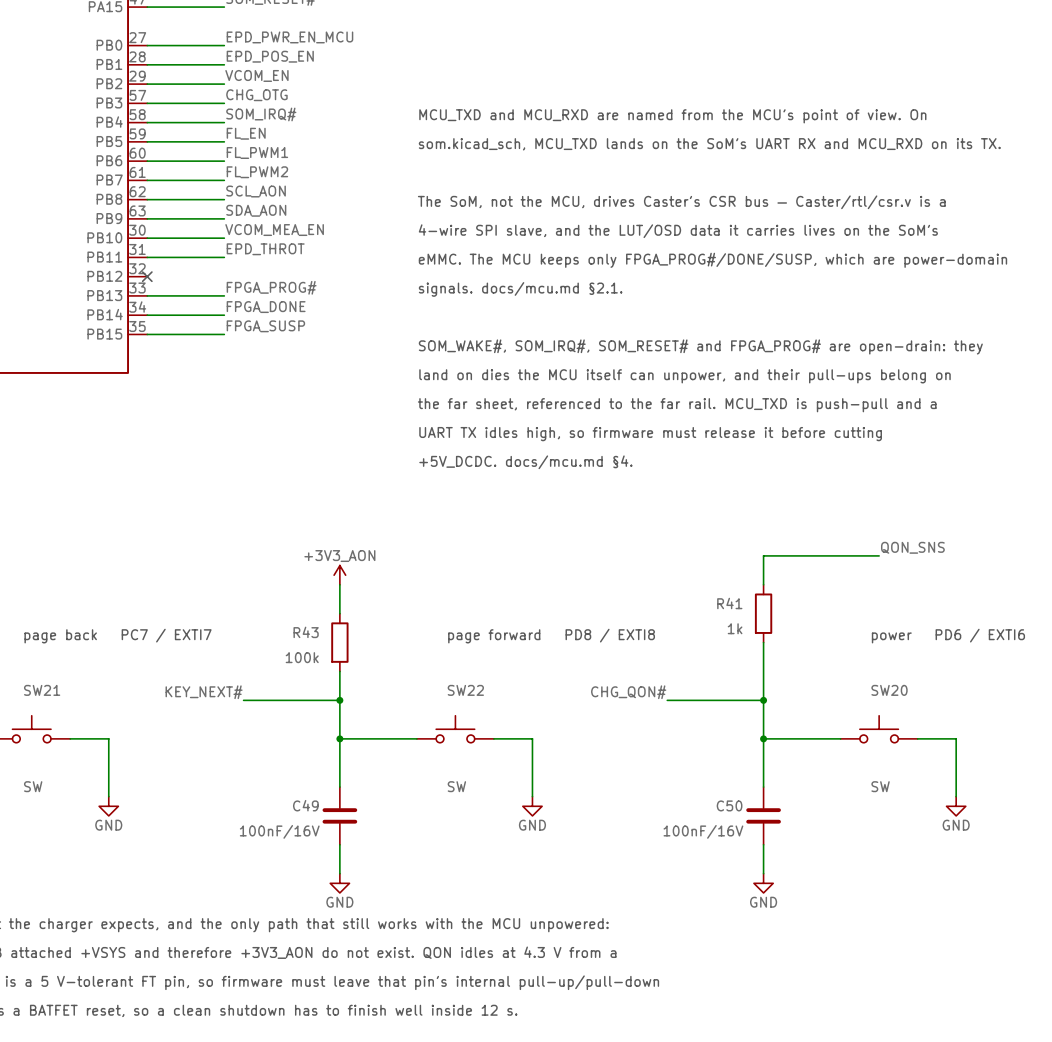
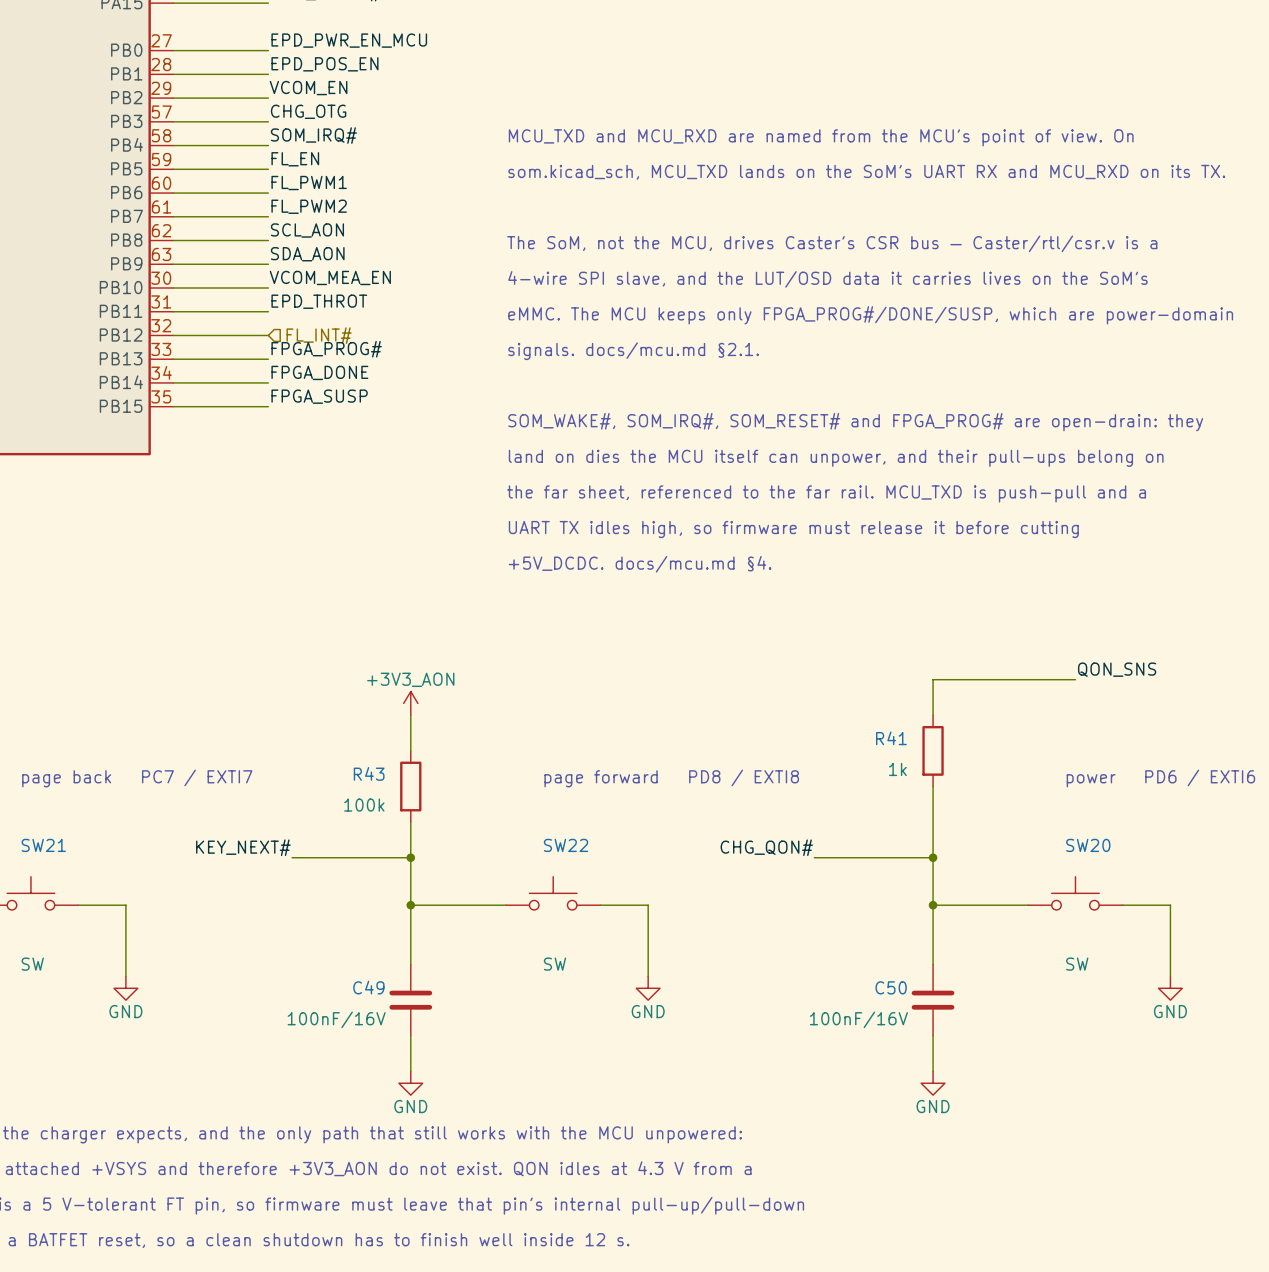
wire: none -> (173, 335) (268, 335)
no-connect mark: (147, 276) -> none
hierarchical label: none -> FL_INT# (319, 335)

